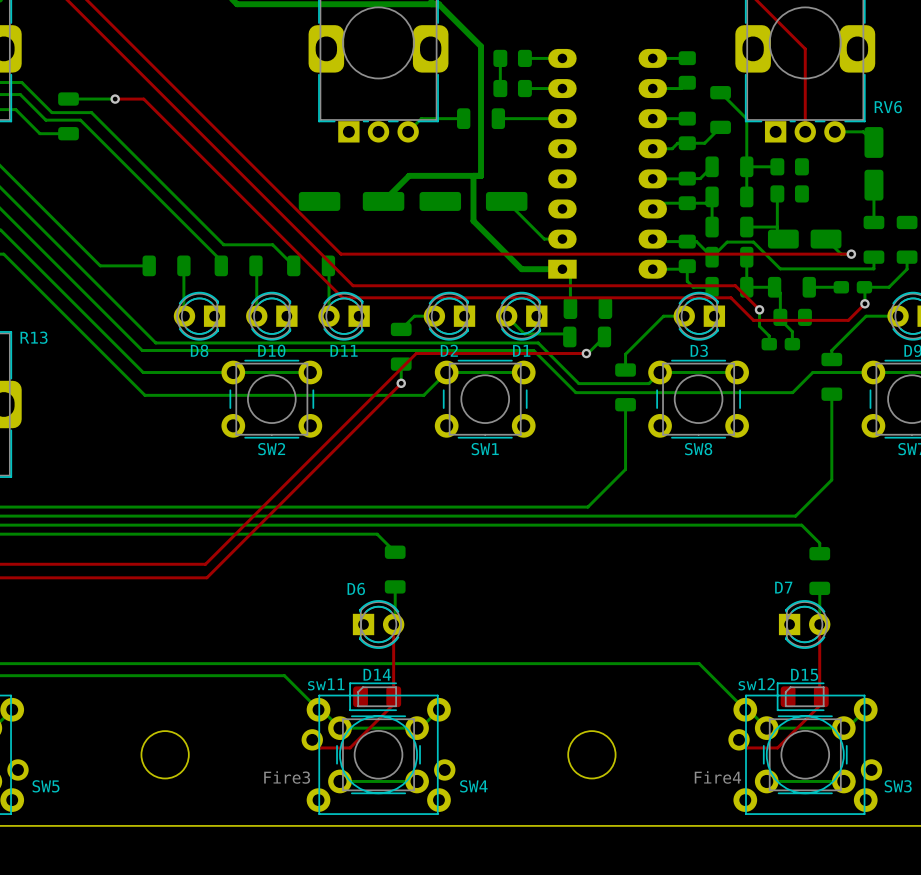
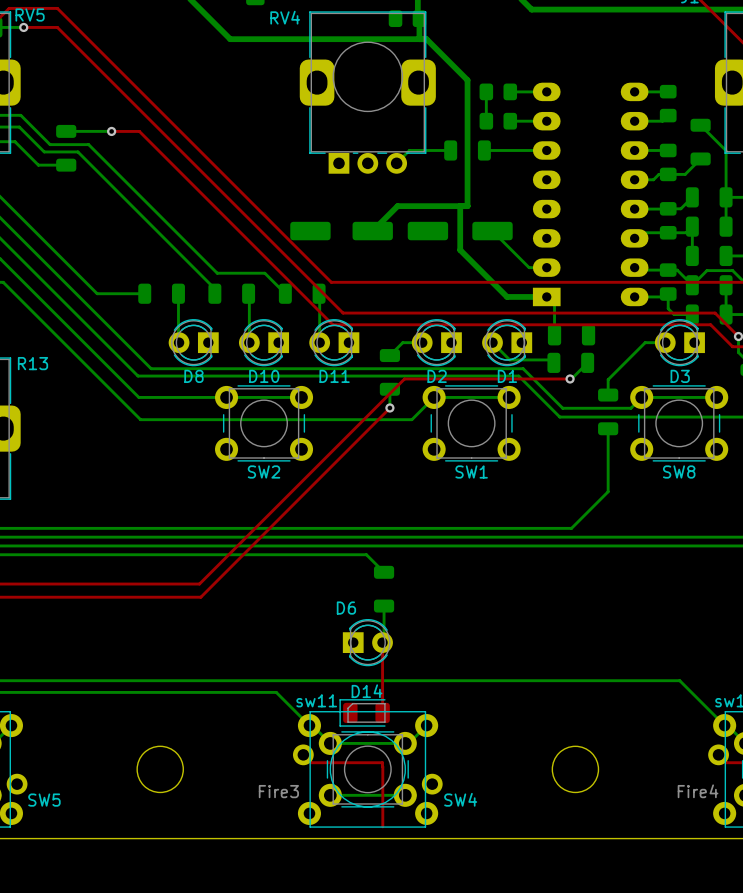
top track: (393, 704) (350, 747) -> (382, 826) (382, 762) (340, 762)

